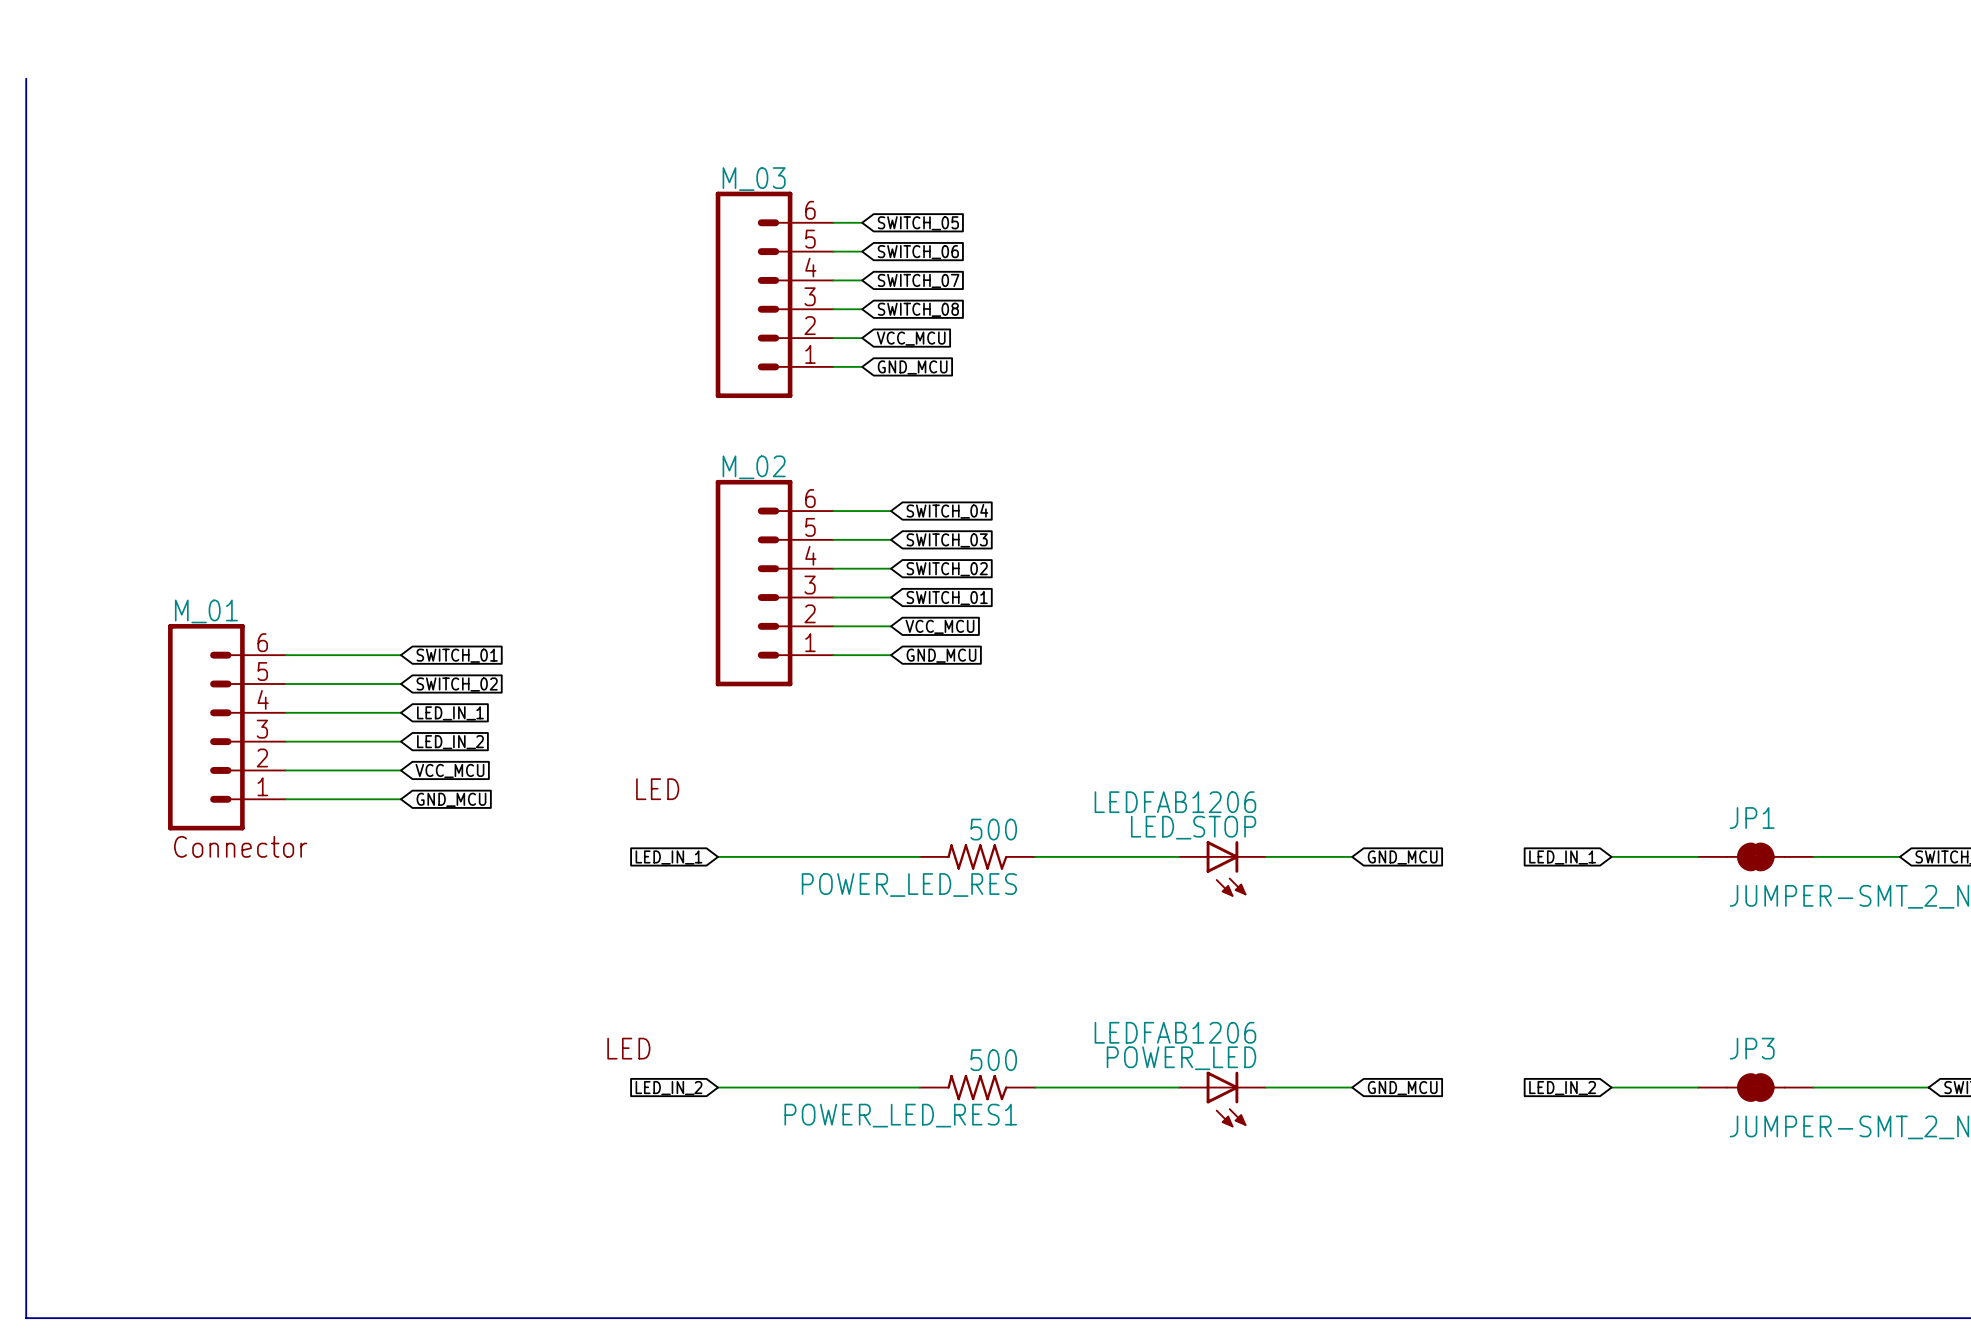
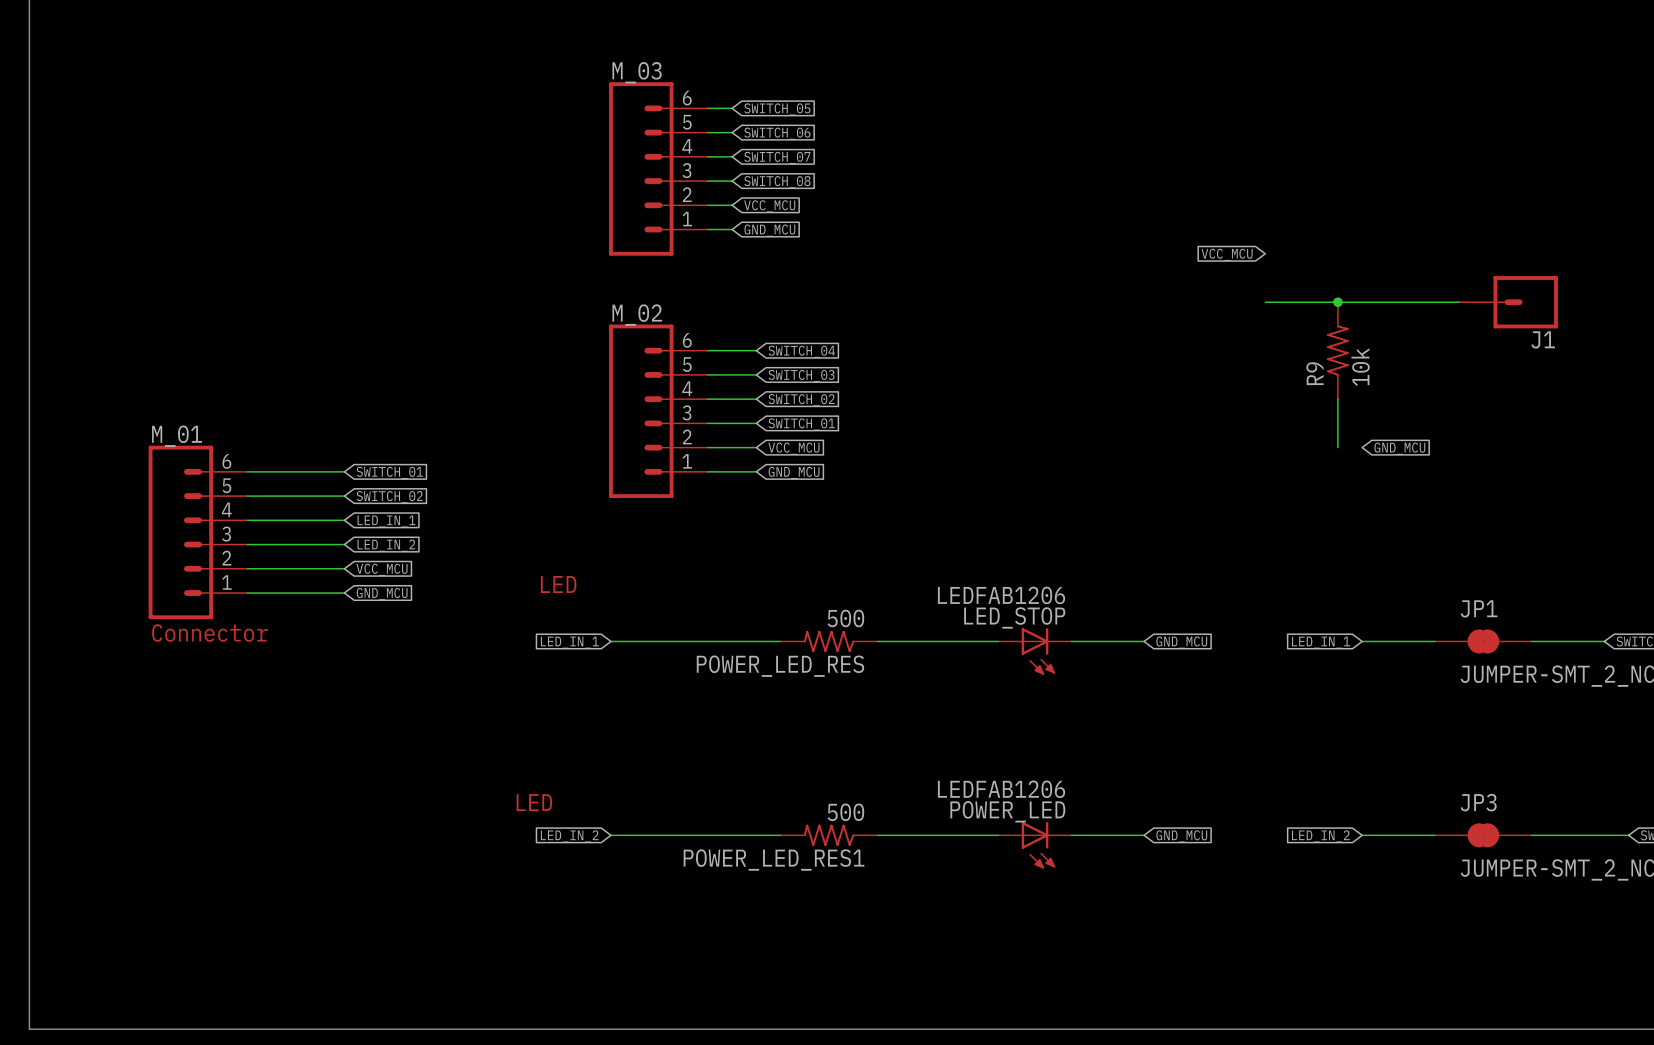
global label: none -> VCC_MCU (1227, 254)
wire: none -> (1265, 302) (1459, 302)
junction: none -> (1337, 302)
J1: none -> (1508, 302)
R9: none -> 10k (1337, 350)
wire: none -> (1337, 399) (1337, 447)
global label: none -> GND_MCU (1399, 448)

